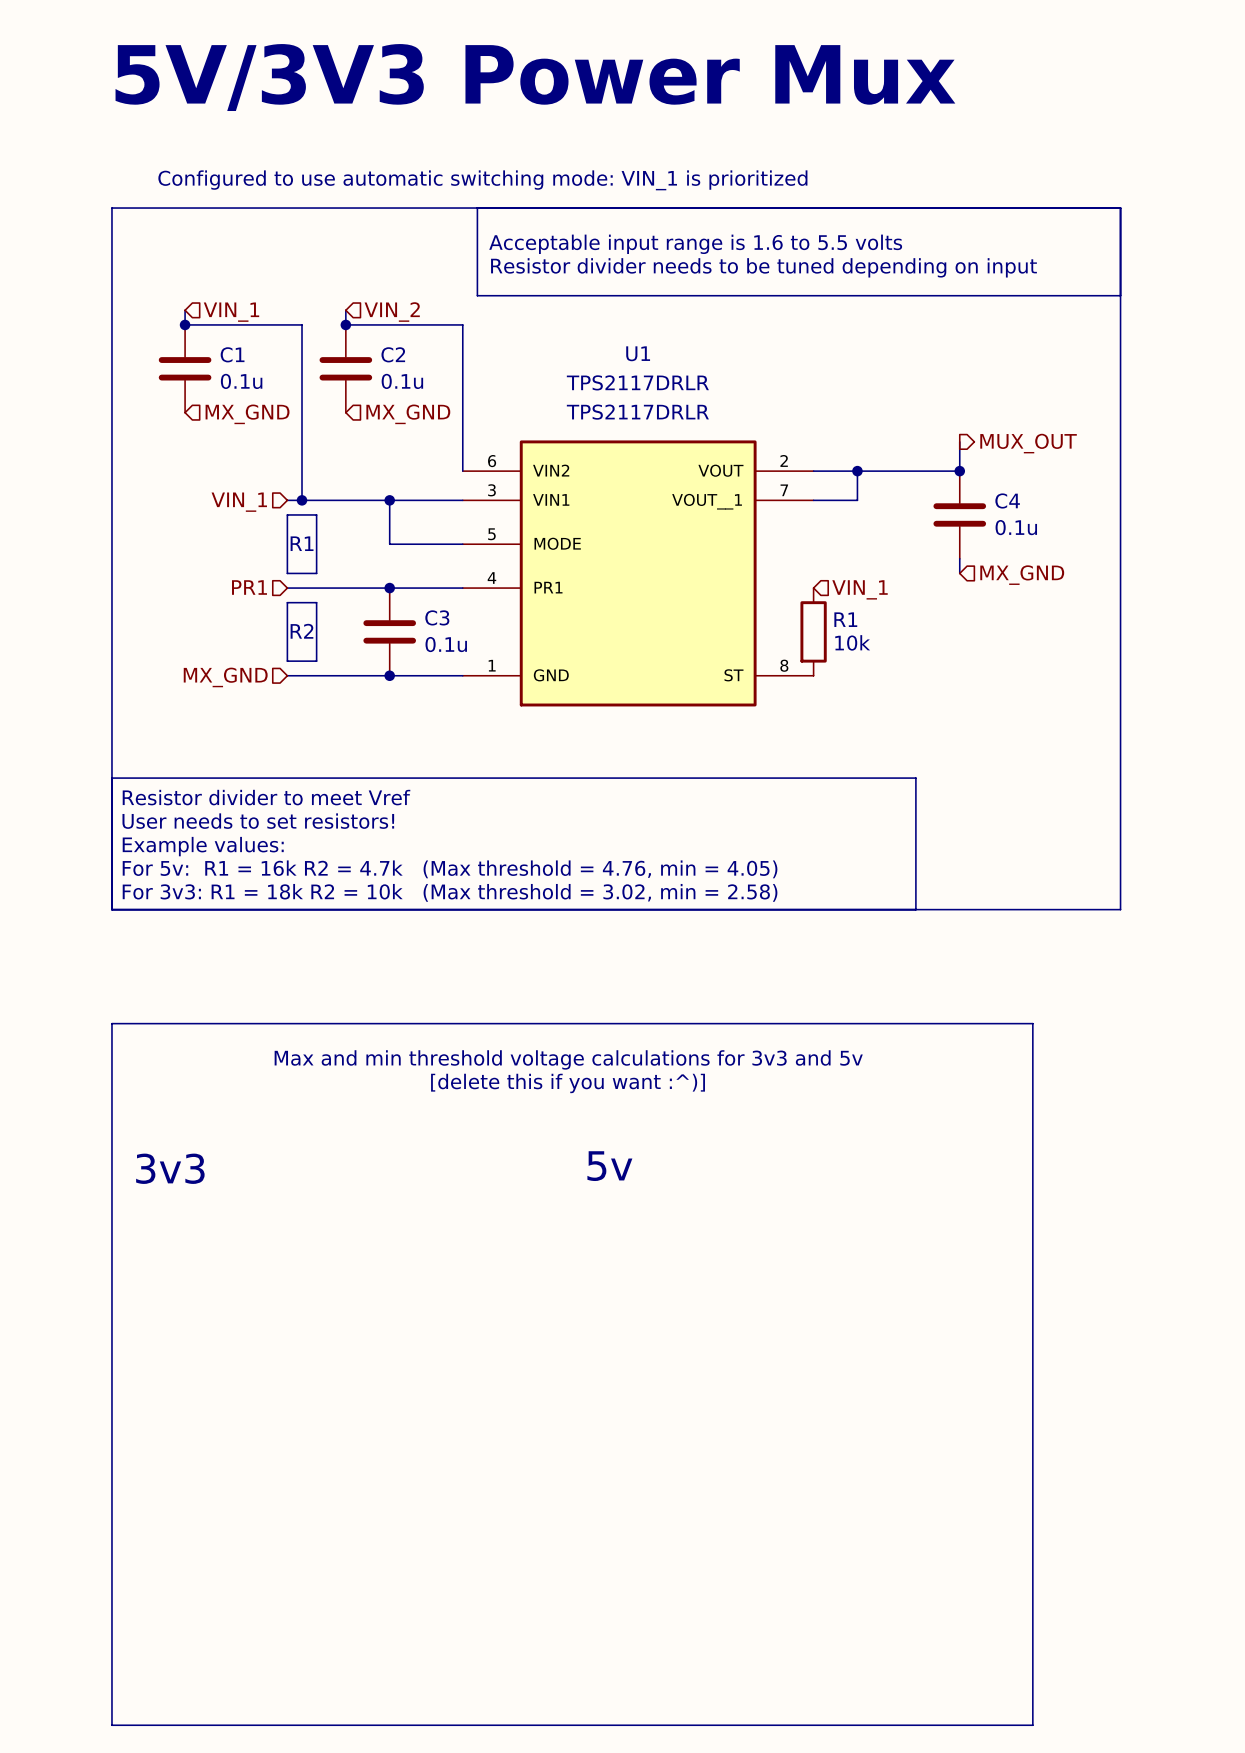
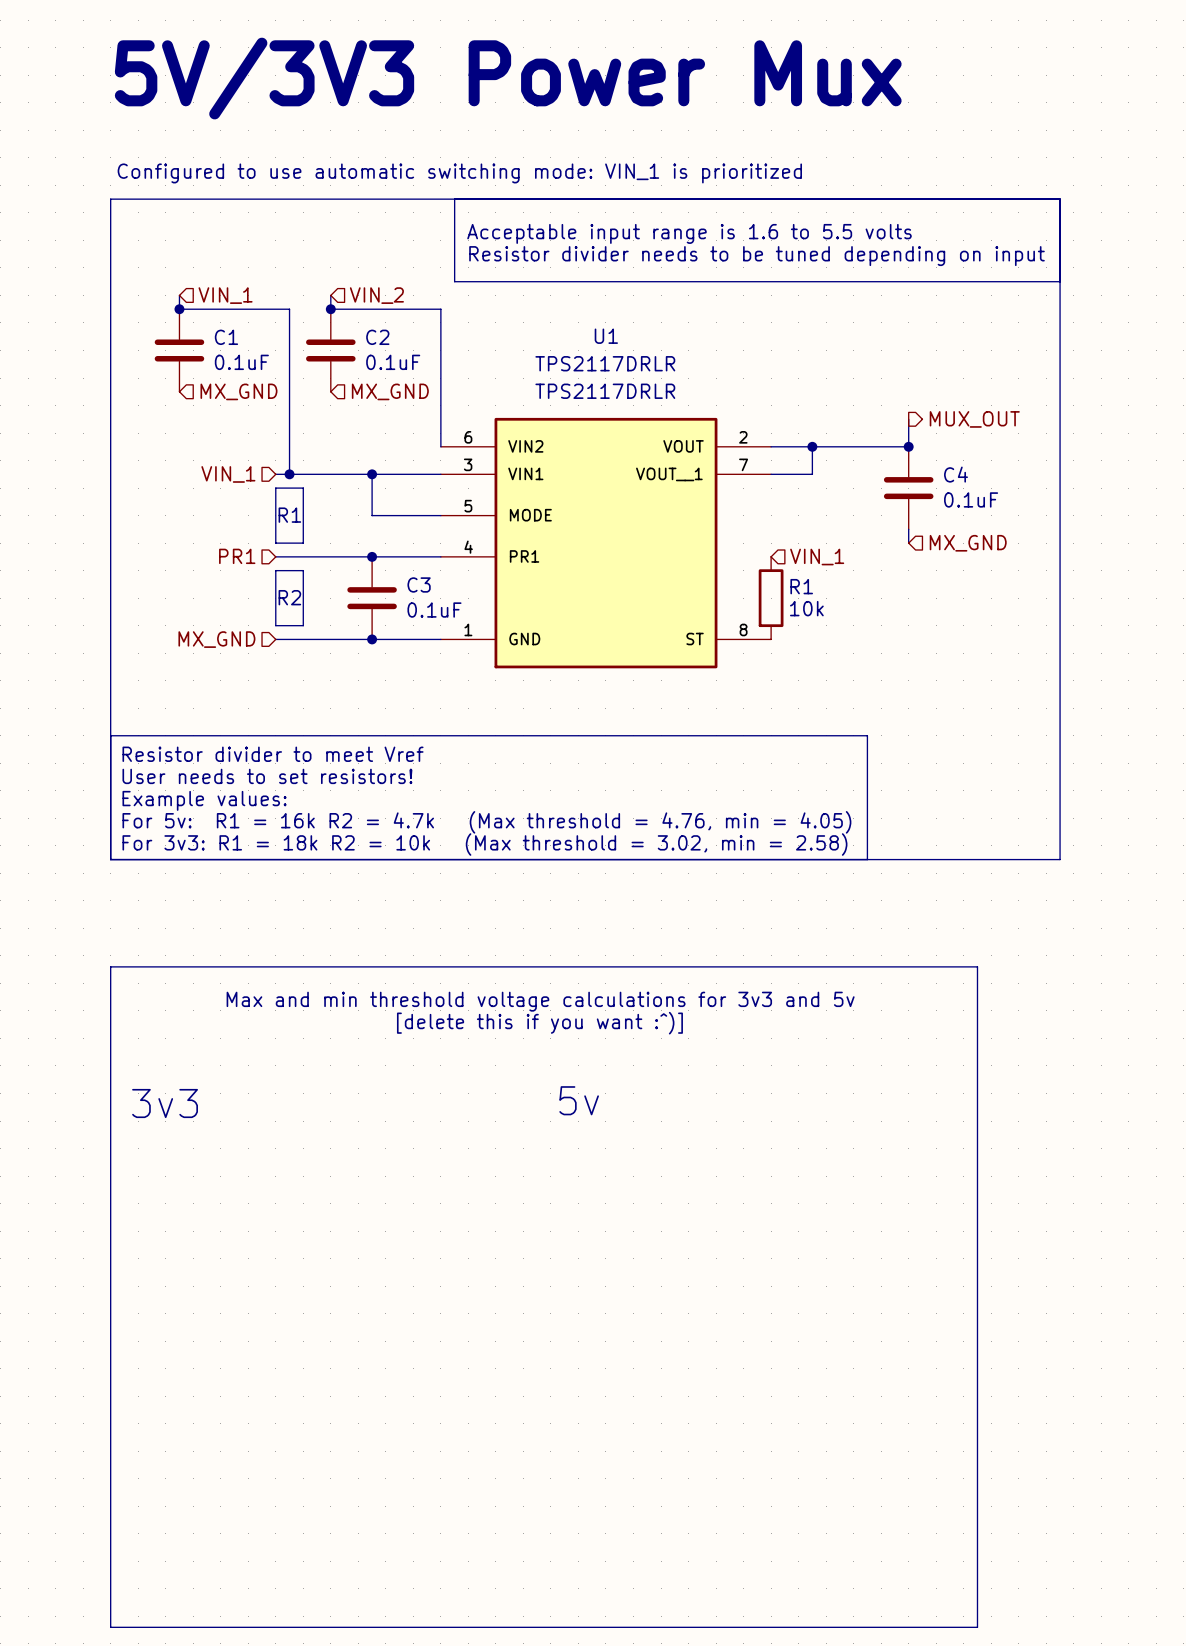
C1 value: 0.1u (241, 381) -> 0.1uF (241, 362)
C2 value: 0.1u (402, 381) -> 0.1uF (393, 362)
C4 value: 0.1u (1016, 527) -> 0.1uF (971, 499)
C3 value: 0.1u (446, 644) -> 0.1uF (434, 610)

